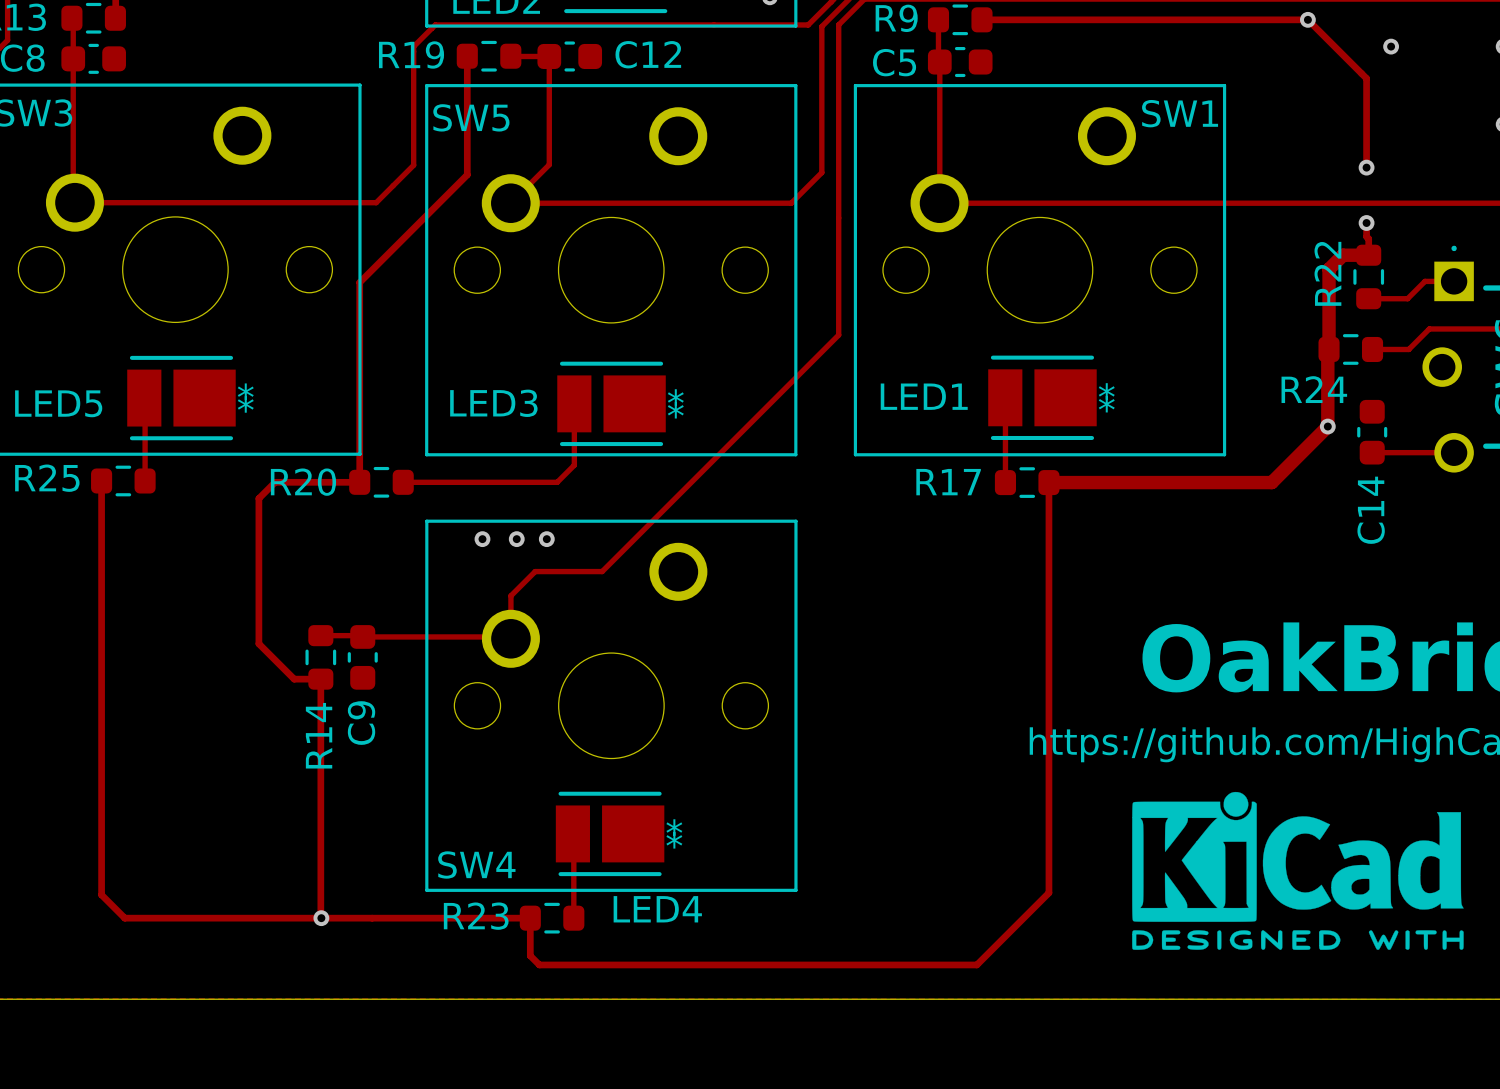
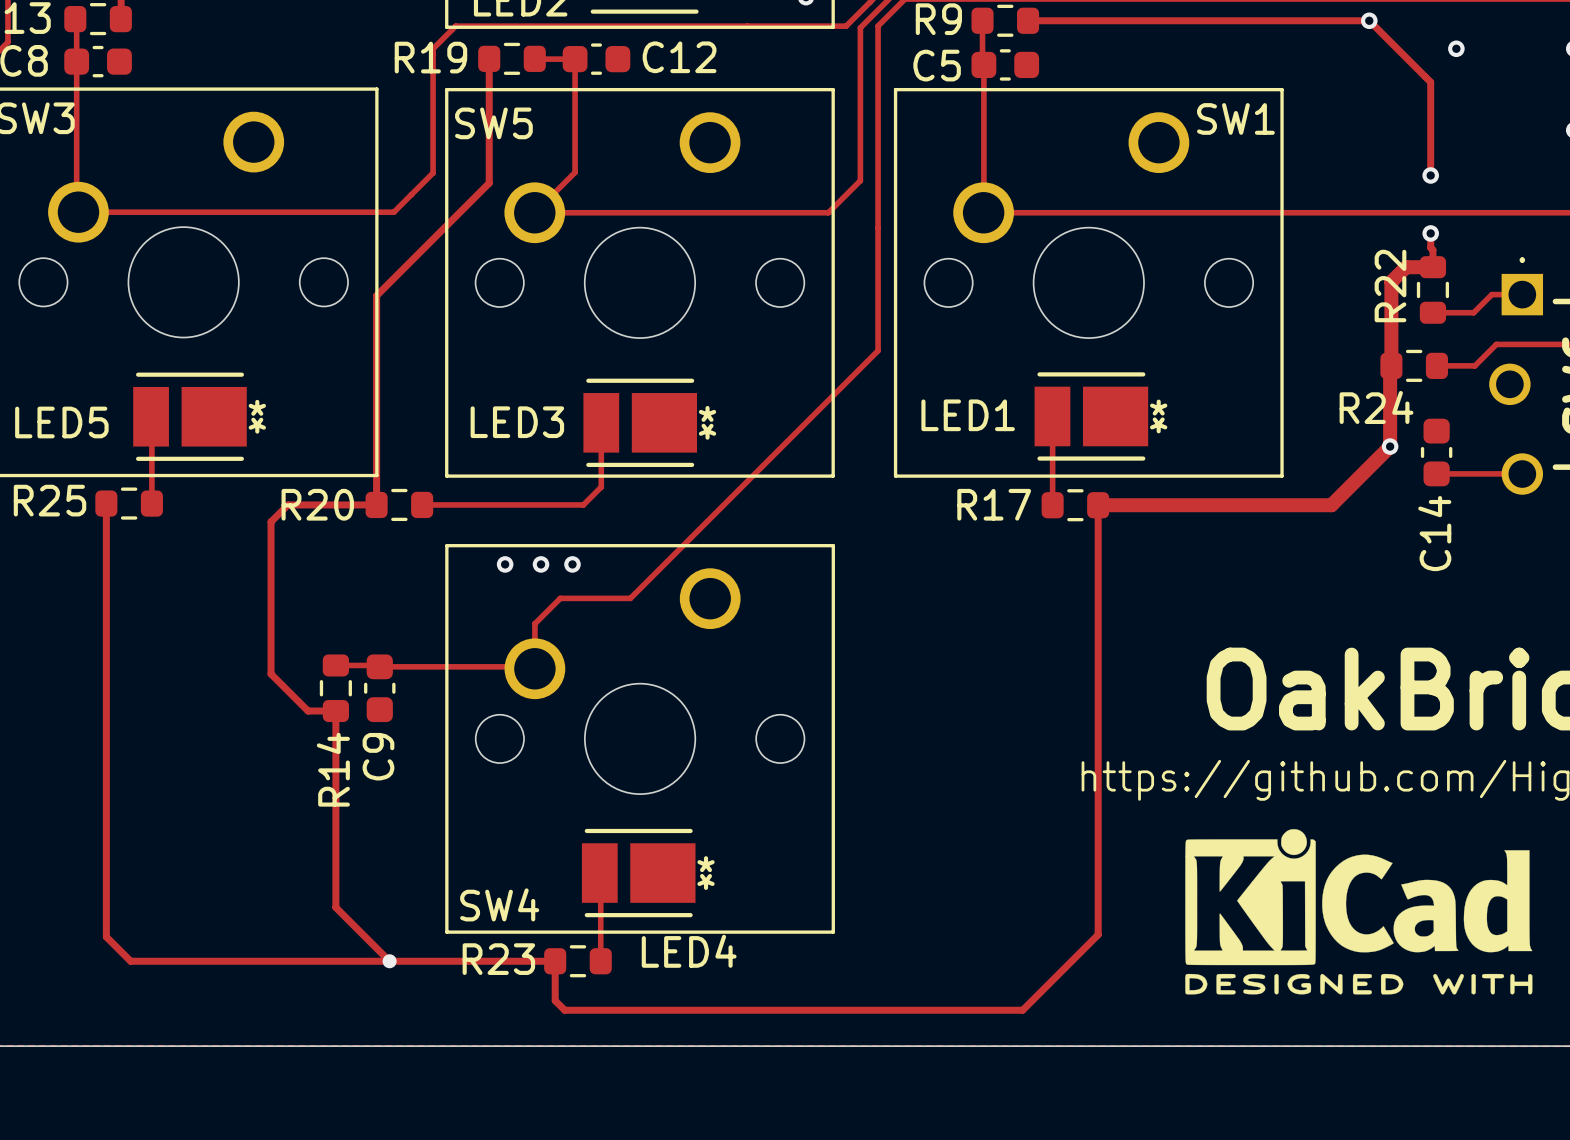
track: (320, 866) (321, 918) -> (335, 907) (389, 961)
via: (321, 918) -> none
via: none -> (389, 961)

